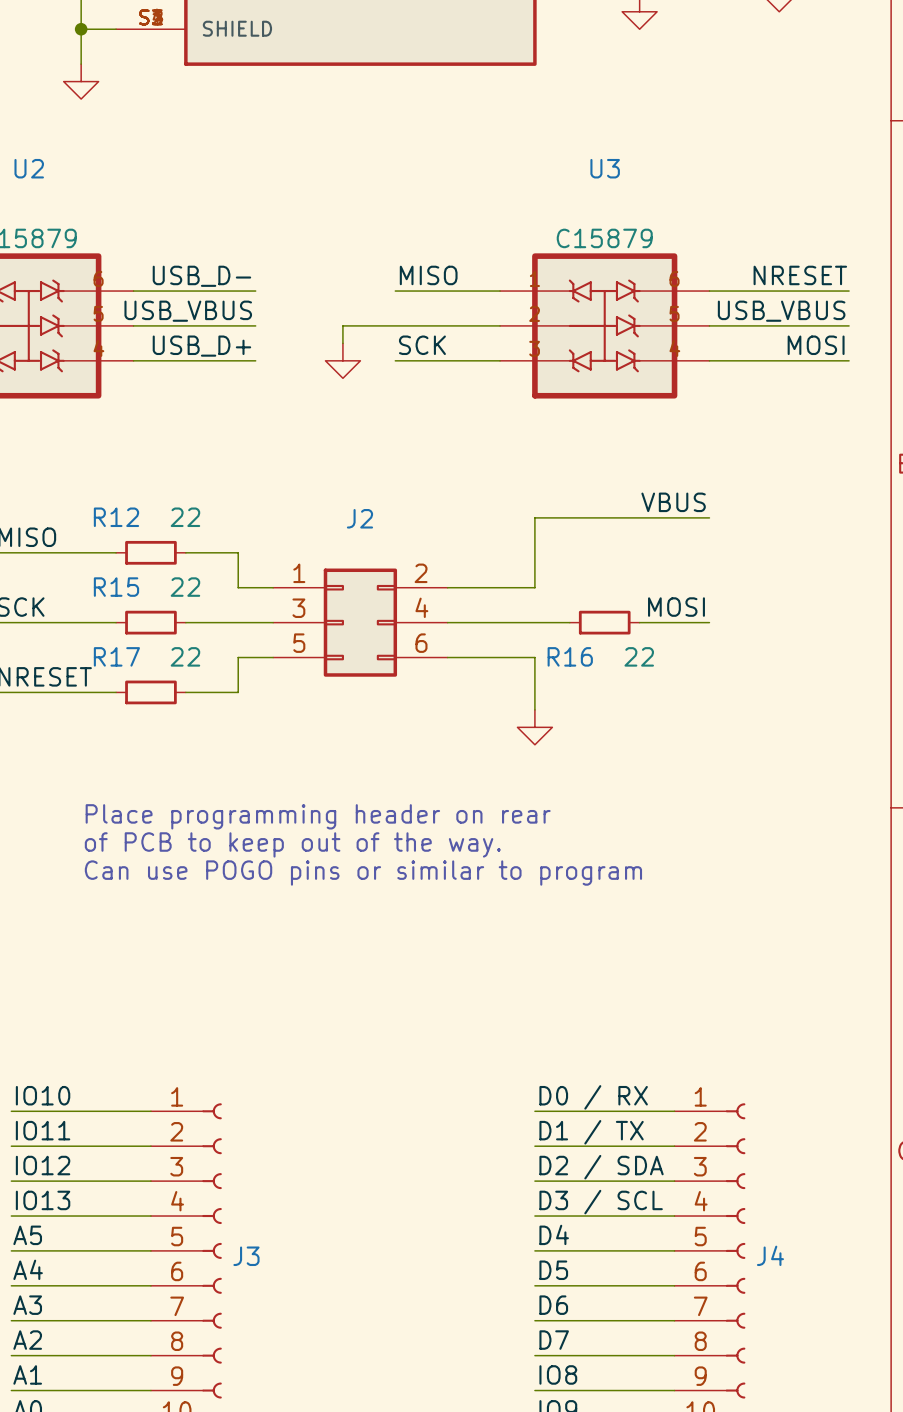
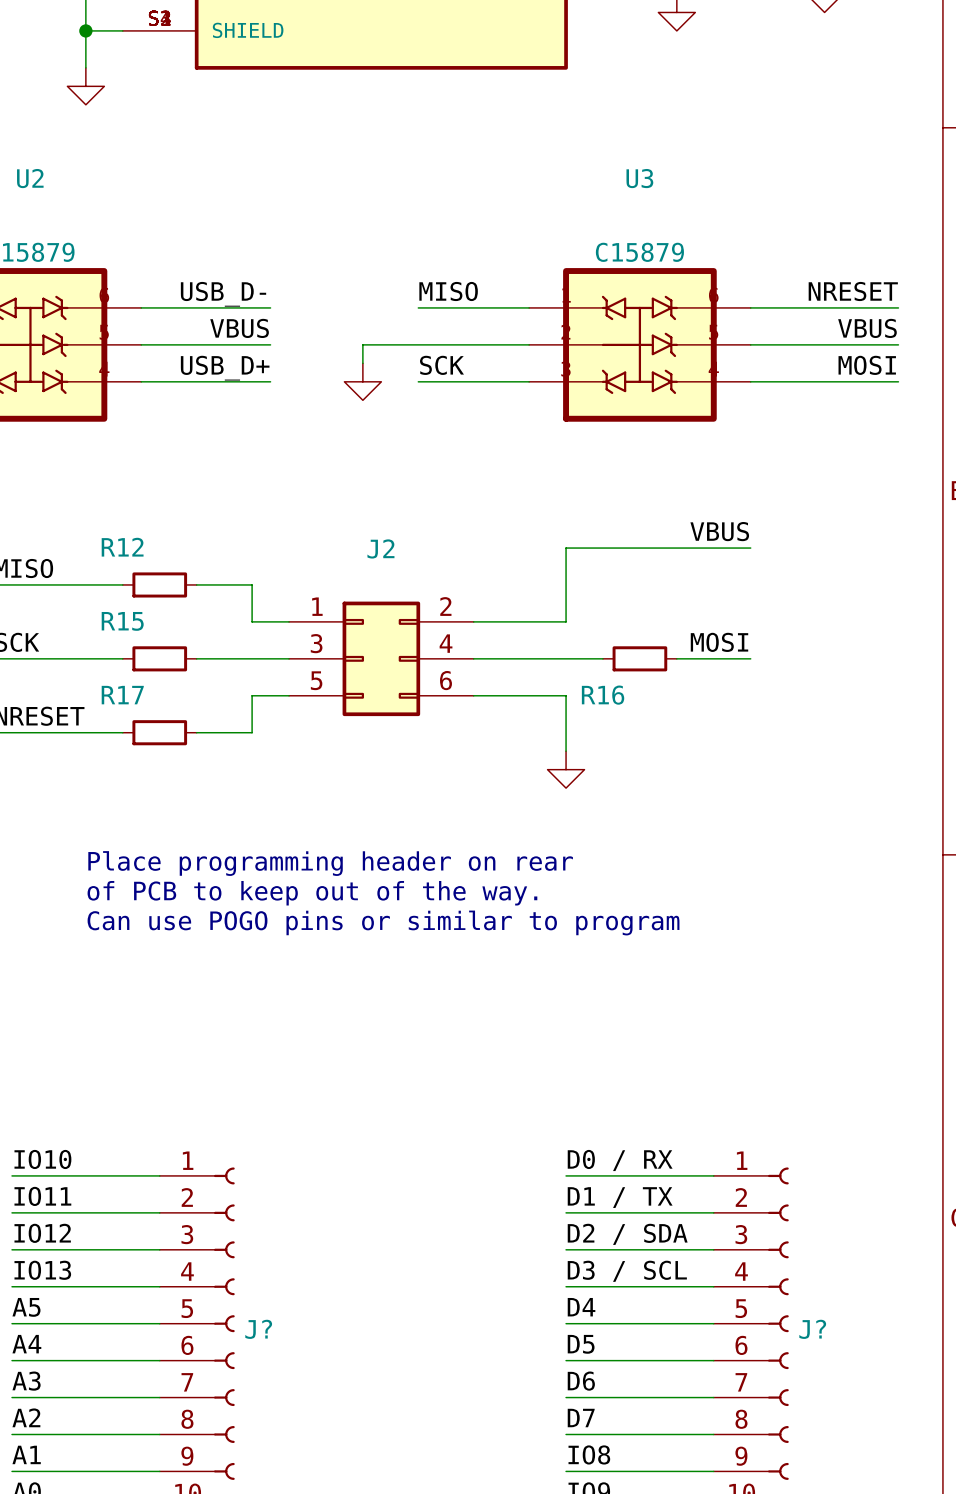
label: USB_VBUS (188, 311) -> VBUS (239, 328)
label: USB_VBUS (781, 311) -> VBUS (867, 328)
R12 value: 22 (185, 517) -> none
R15 value: 22 (185, 587) -> none
R17 value: 22 (185, 656) -> none
R16 value: 22 (639, 656) -> none
J4 name: J4 (770, 1255) -> J? (812, 1329)
J3 name: J3 (246, 1256) -> J? (258, 1329)

